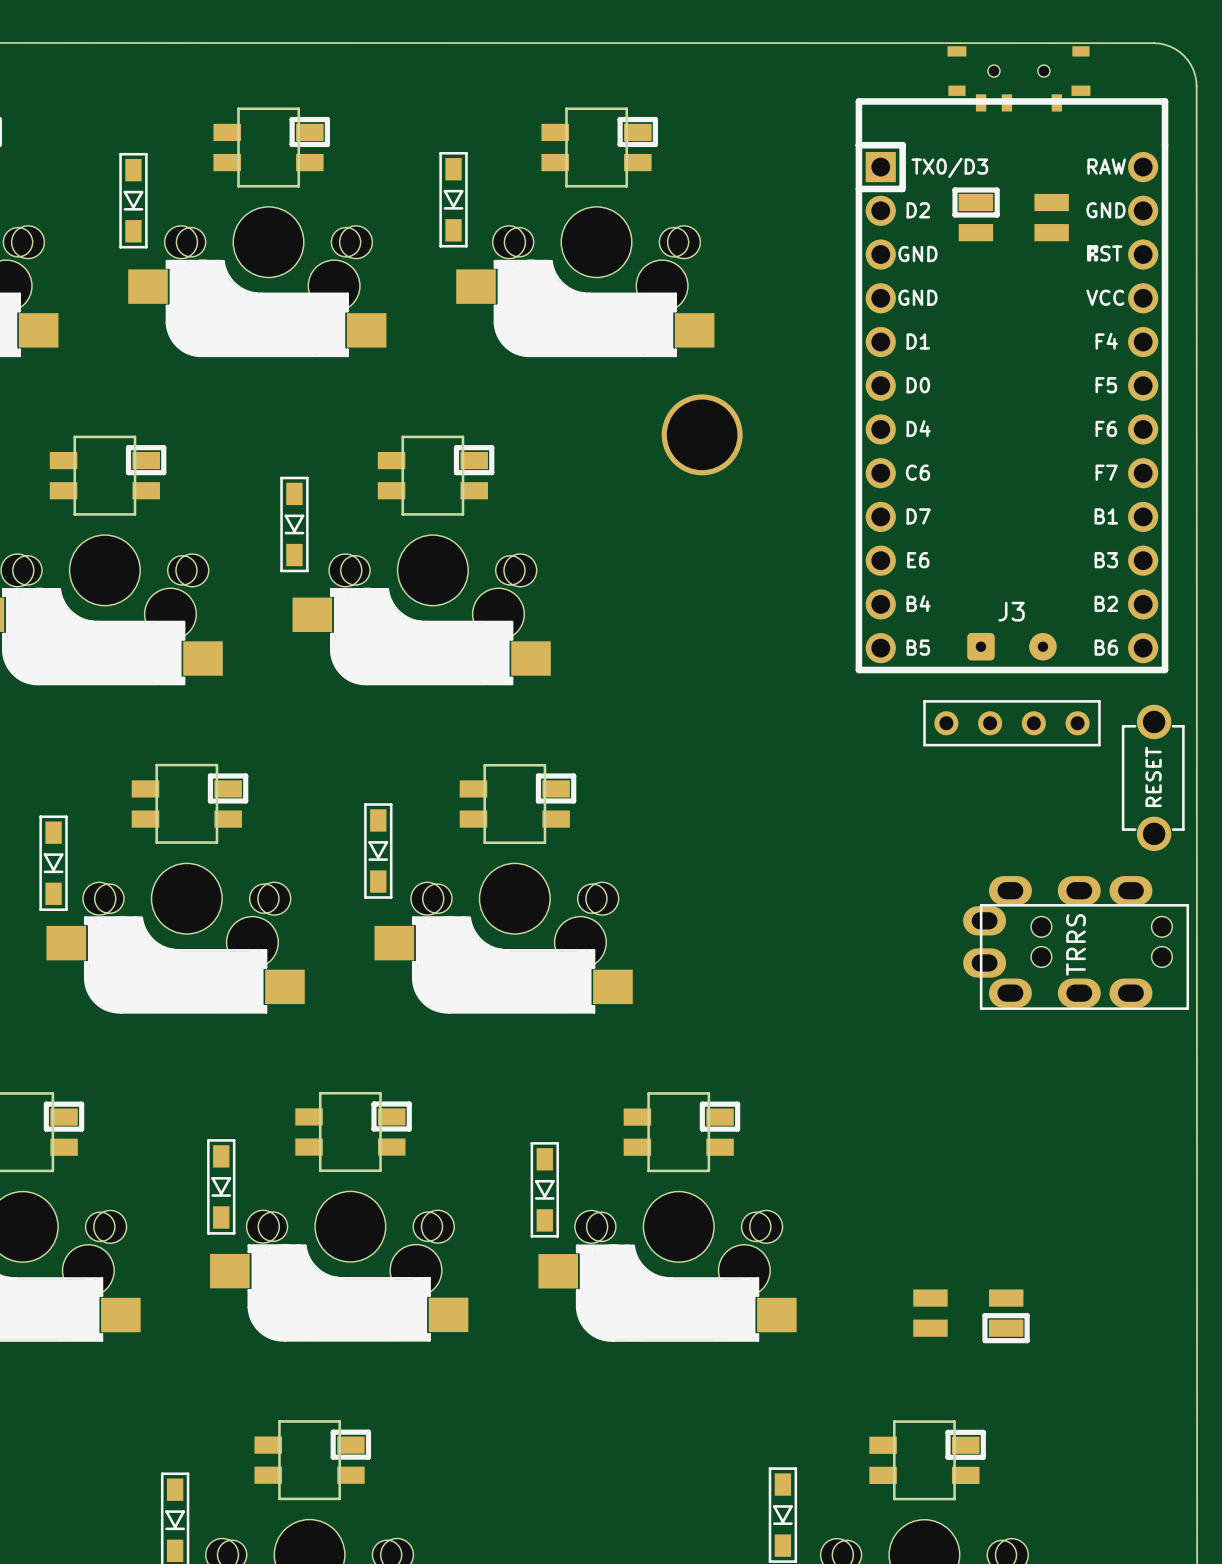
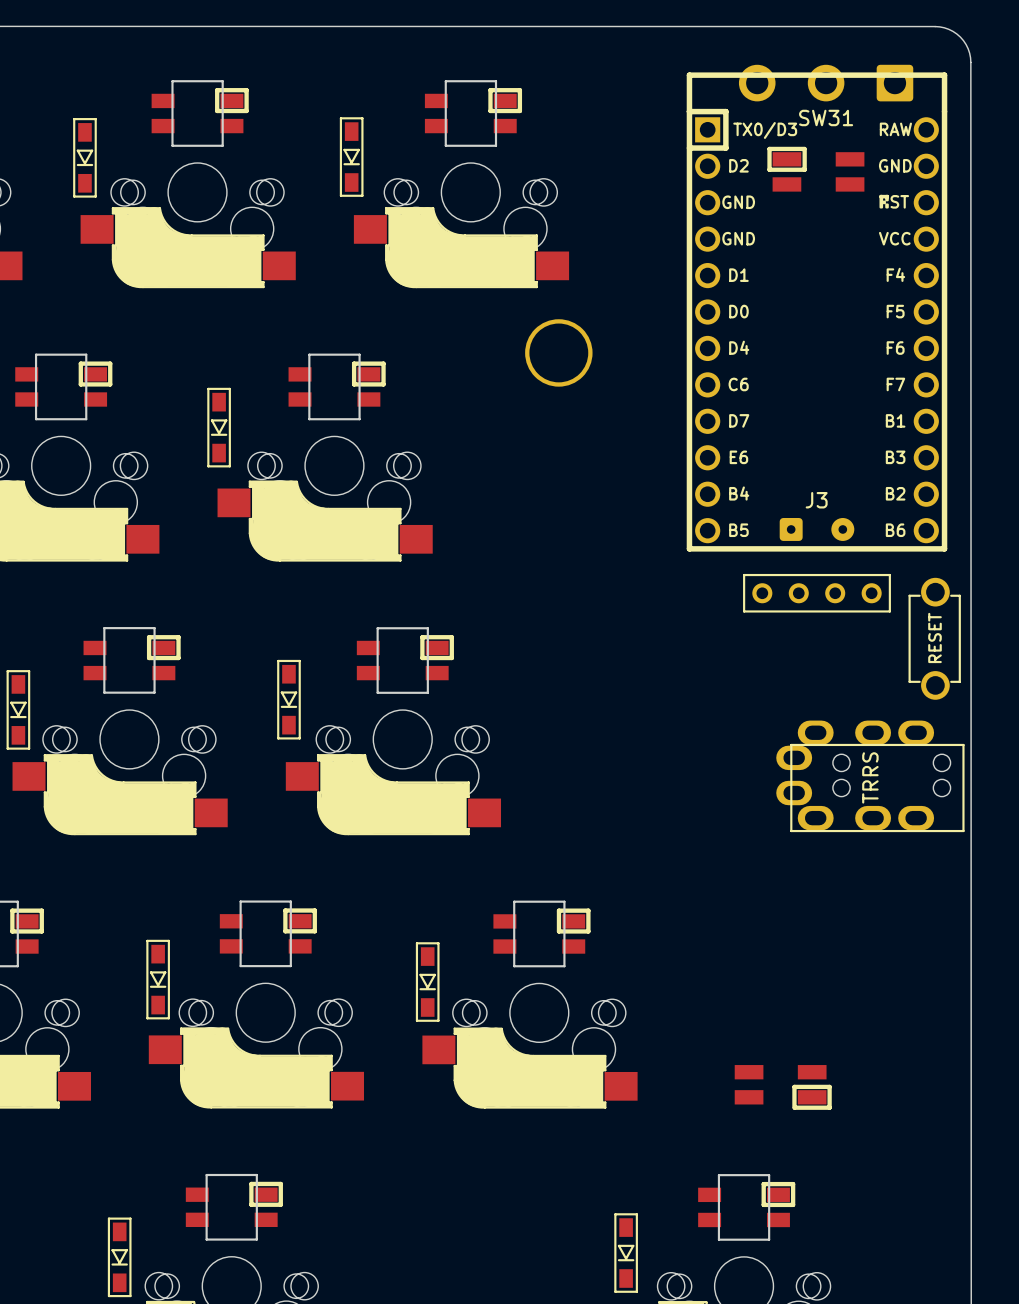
part: (1018, 78) -> none
SW31: none -> (826, 83)

